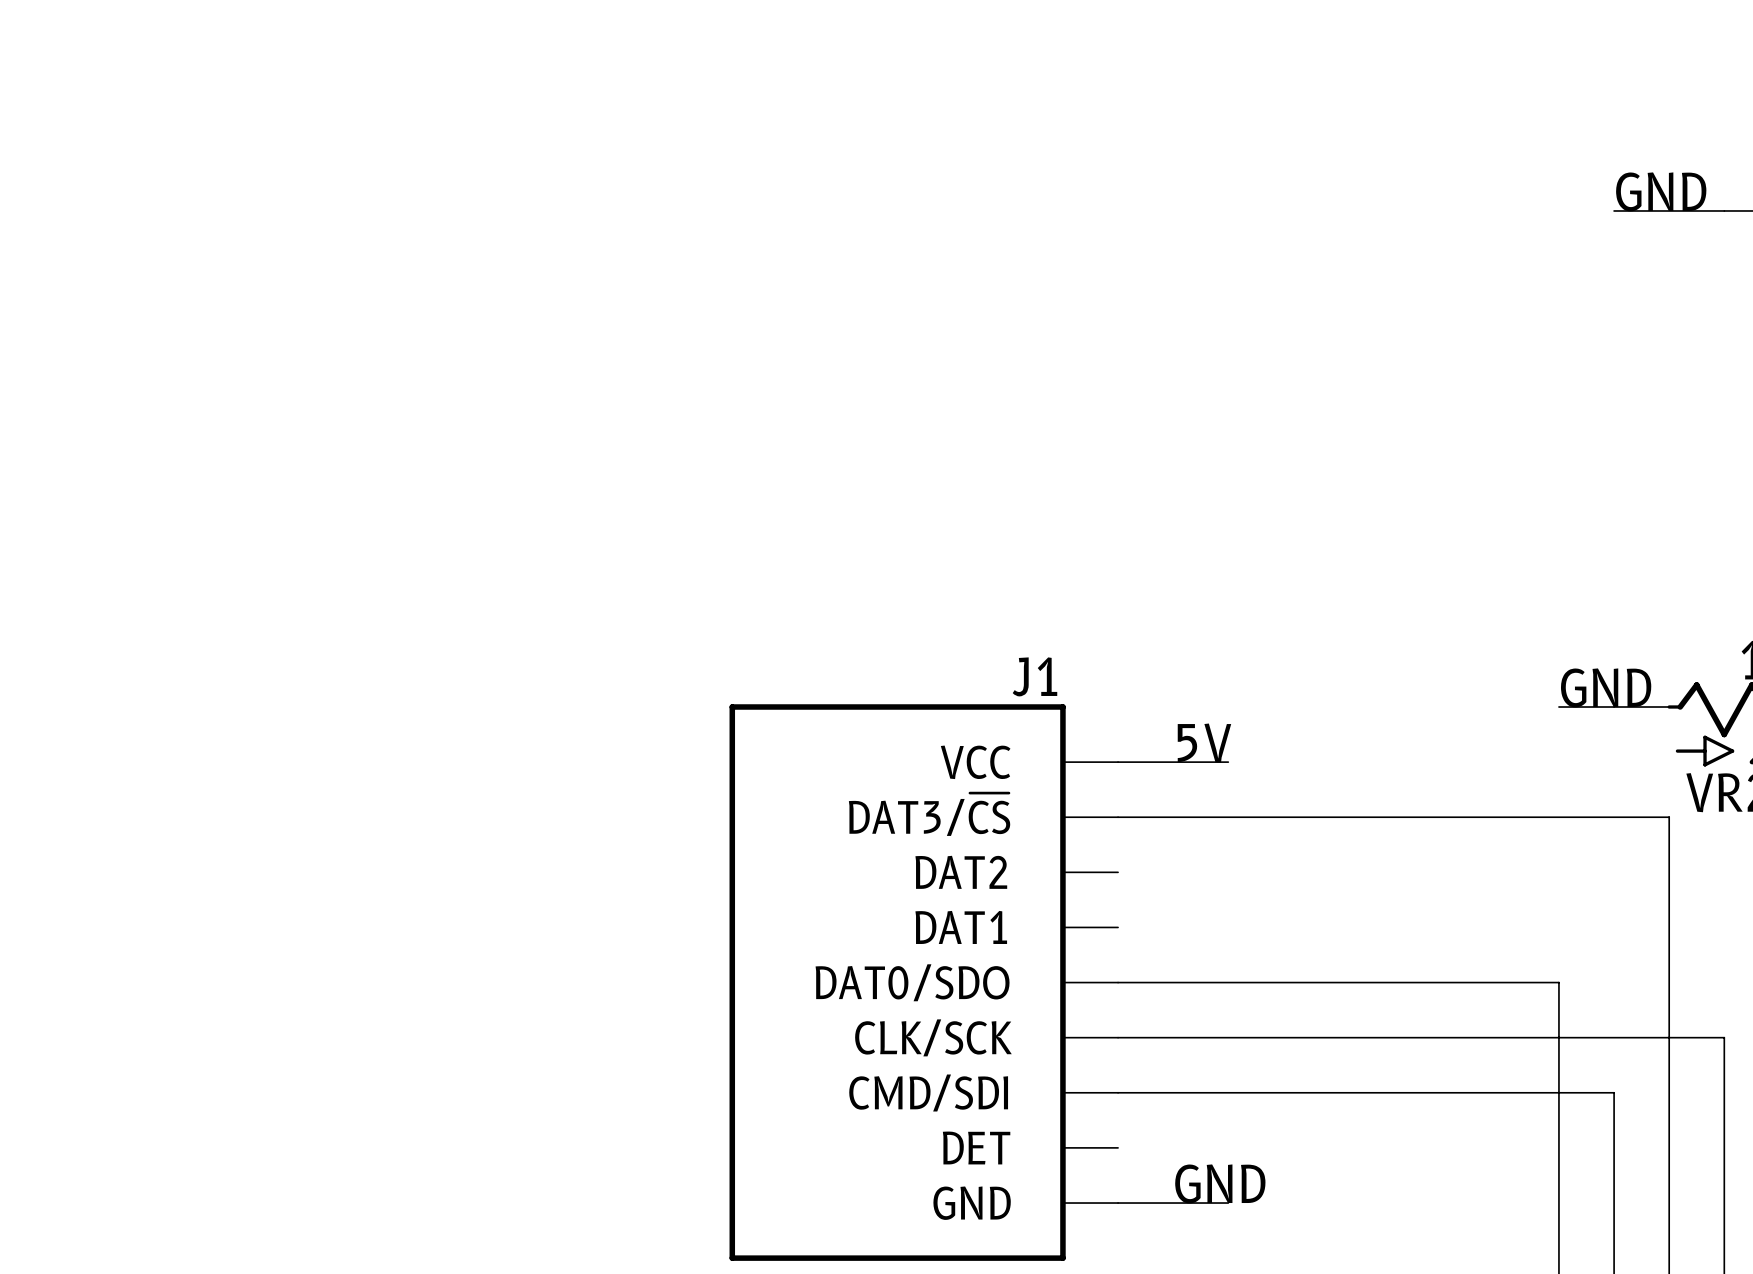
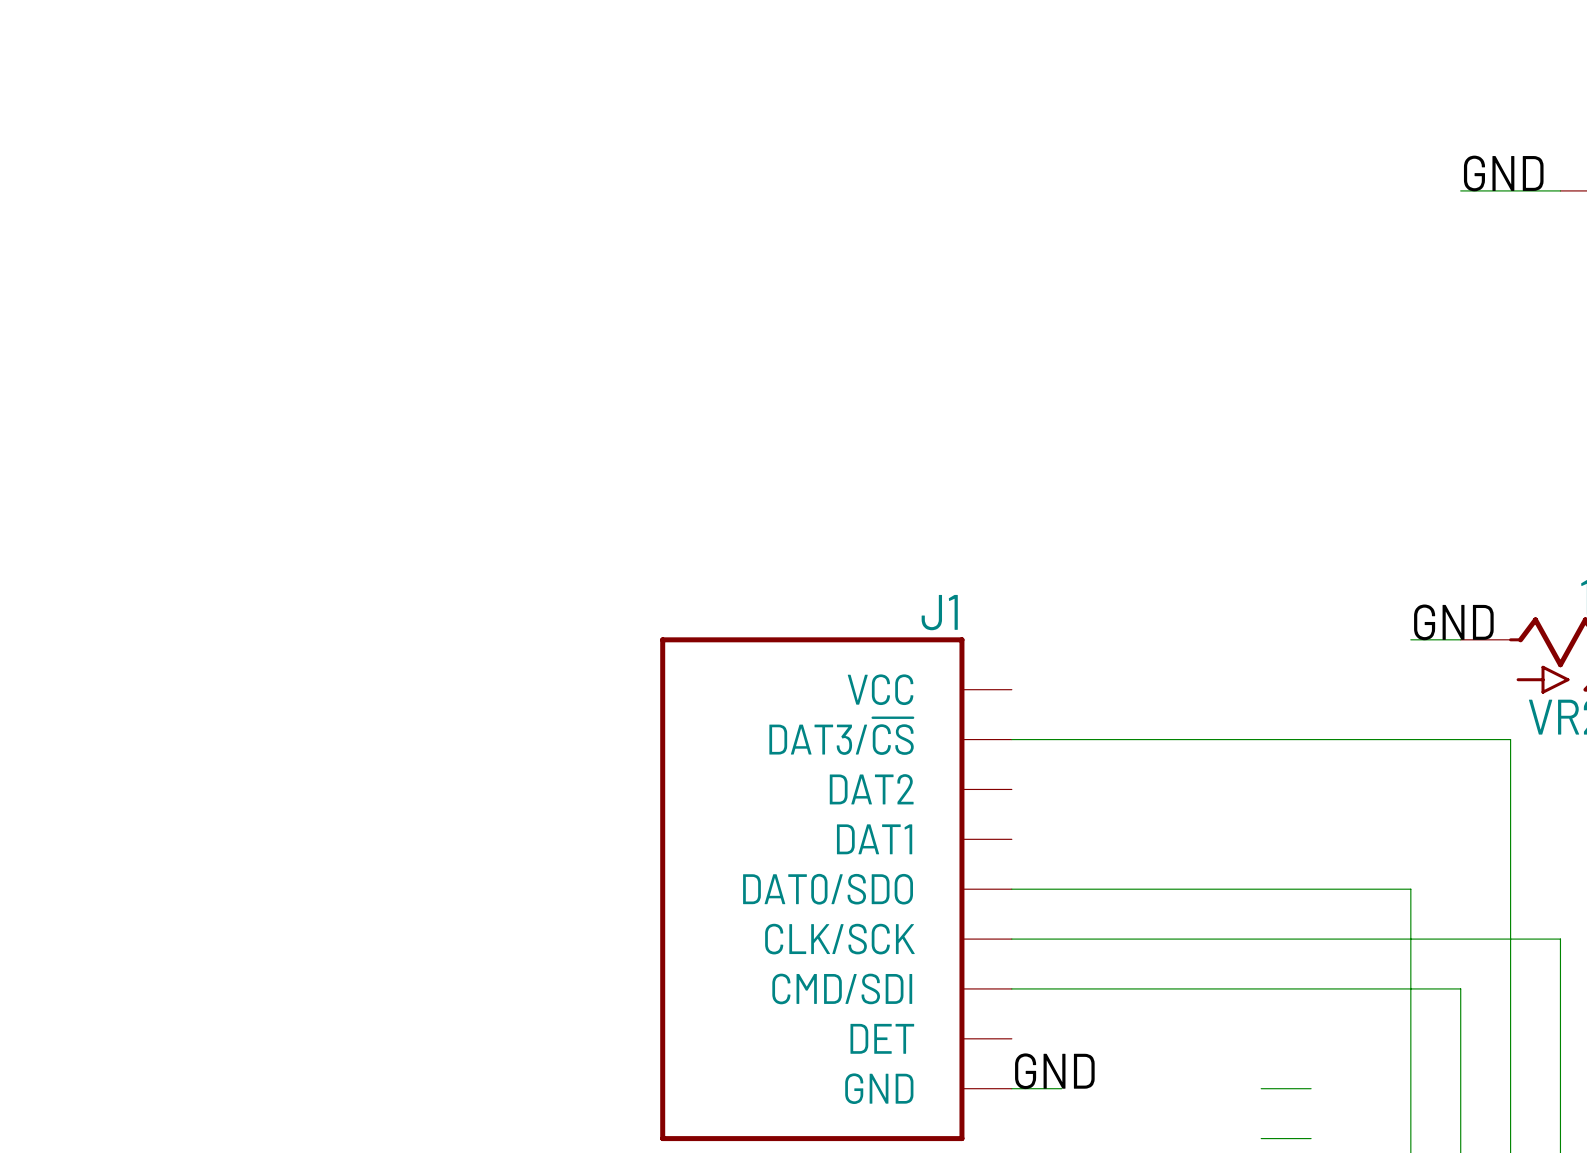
label: 5V (1204, 743) -> none
wire: (1118, 762) (1228, 762) -> none
label position: GND (1220, 1183) -> GND (1054, 1071)
wire: (1173, 1203) (1228, 1203) -> (1261, 1088) (1311, 1088)
wire: none -> (1261, 1138) (1311, 1138)

